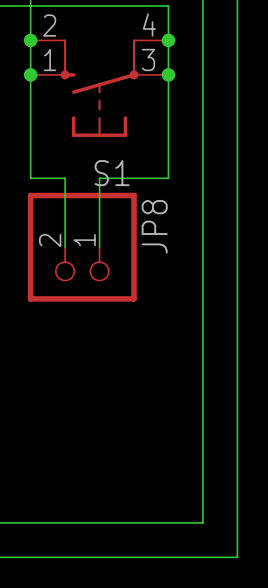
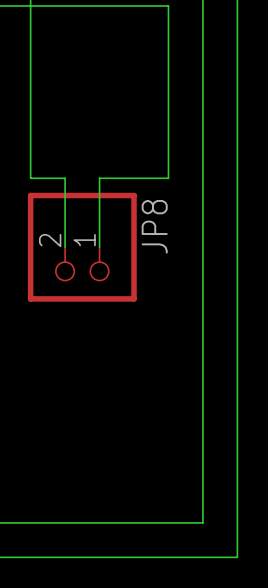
junction: (30, 40) -> none
junction: (168, 40) -> none
junction: (30, 74) -> none
junction: (168, 74) -> none
S1: (99, 88) -> none

